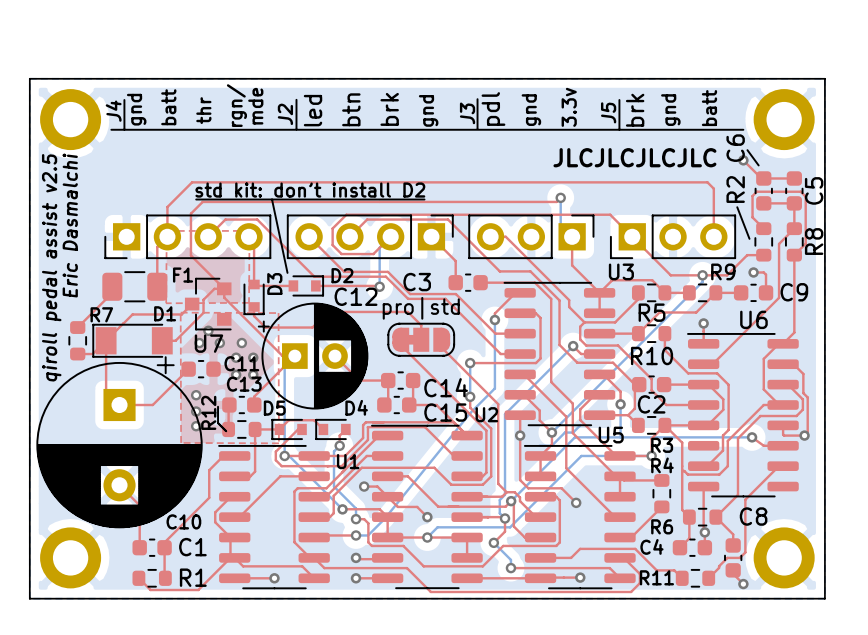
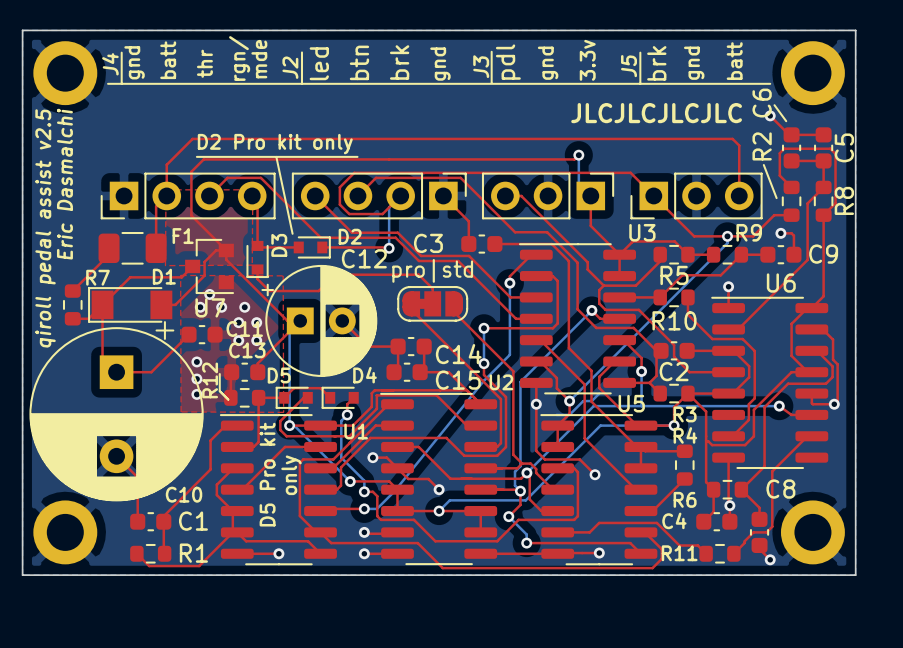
text: none -> D2 Pro kit only (275, 144)
text: std kit: don’t install D2 (310, 190) -> none
line: (349, 199) (424, 199) -> none
text: none -> D5 Pro kit (267, 474)
text: none -> only (291, 475)

